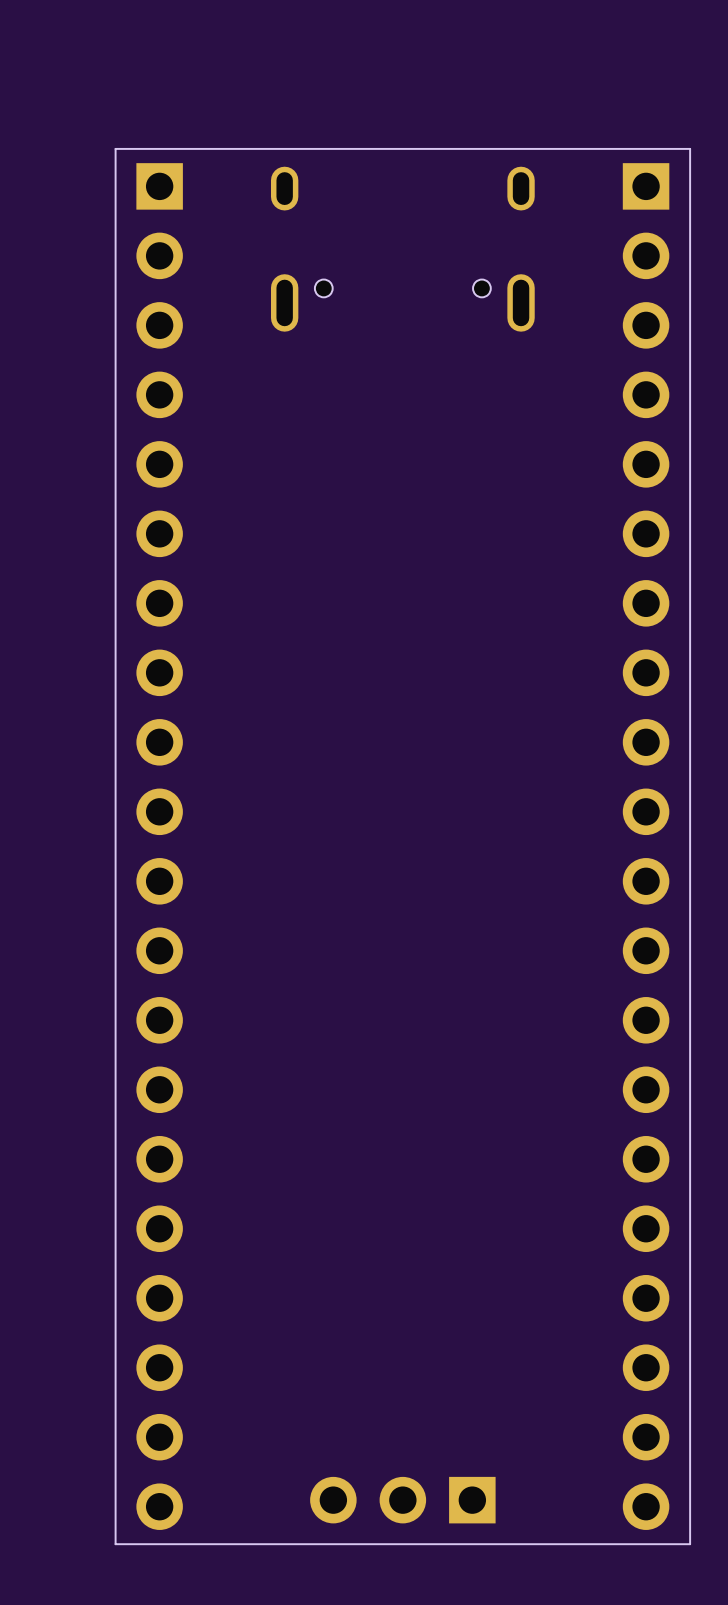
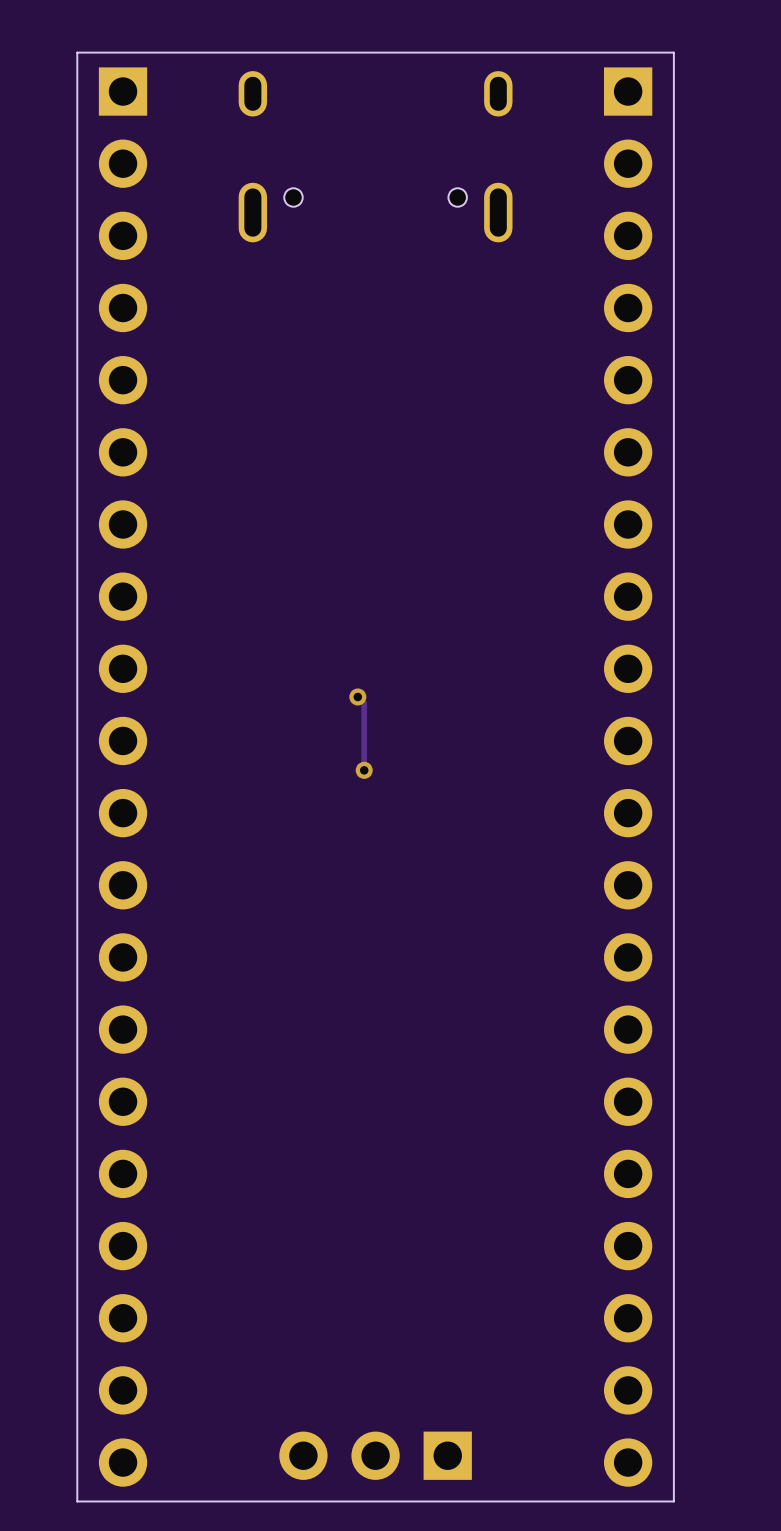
track: none -> (357, 696) (364, 703) (364, 770)
via: none -> (357, 696)
via: none -> (364, 770)

